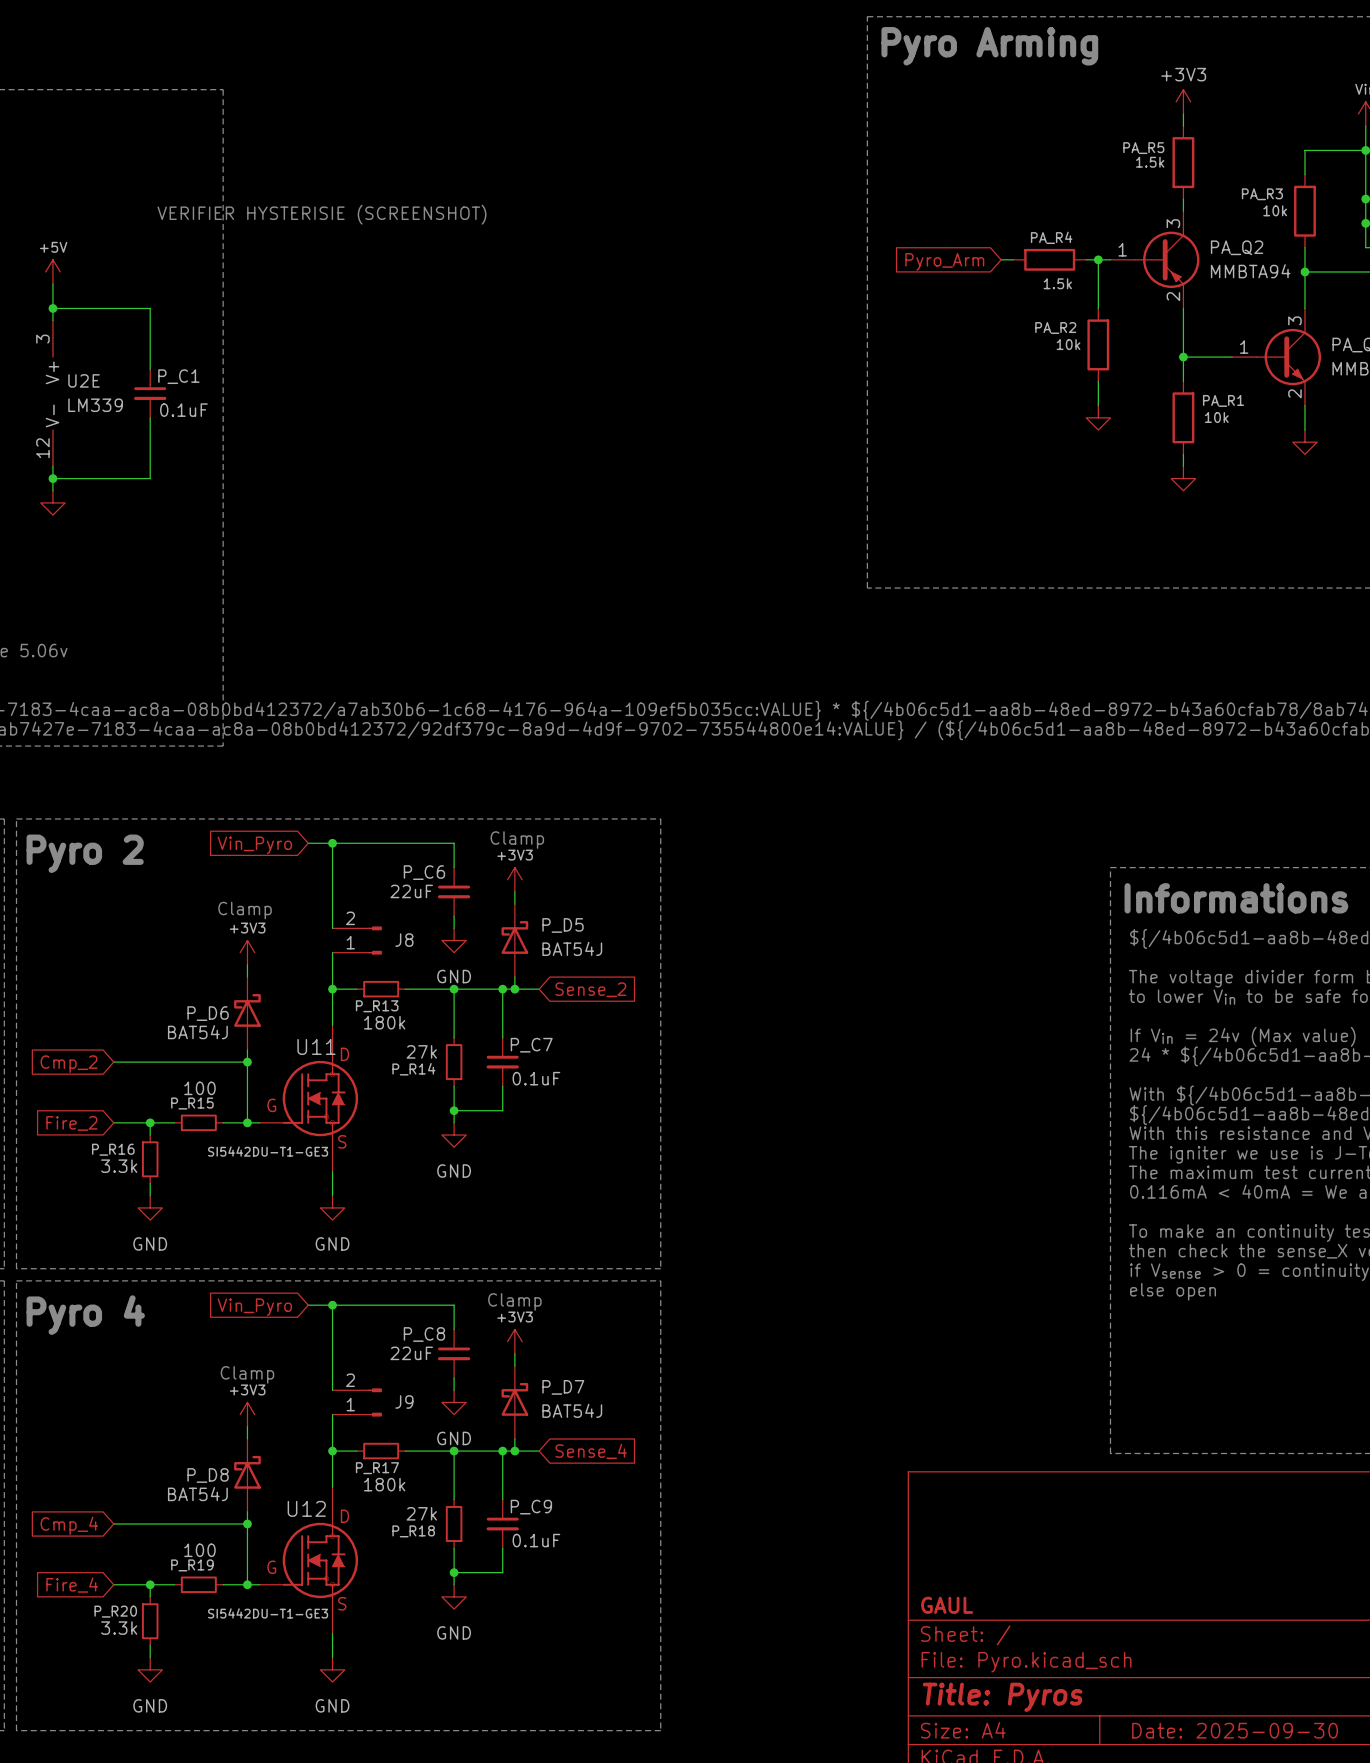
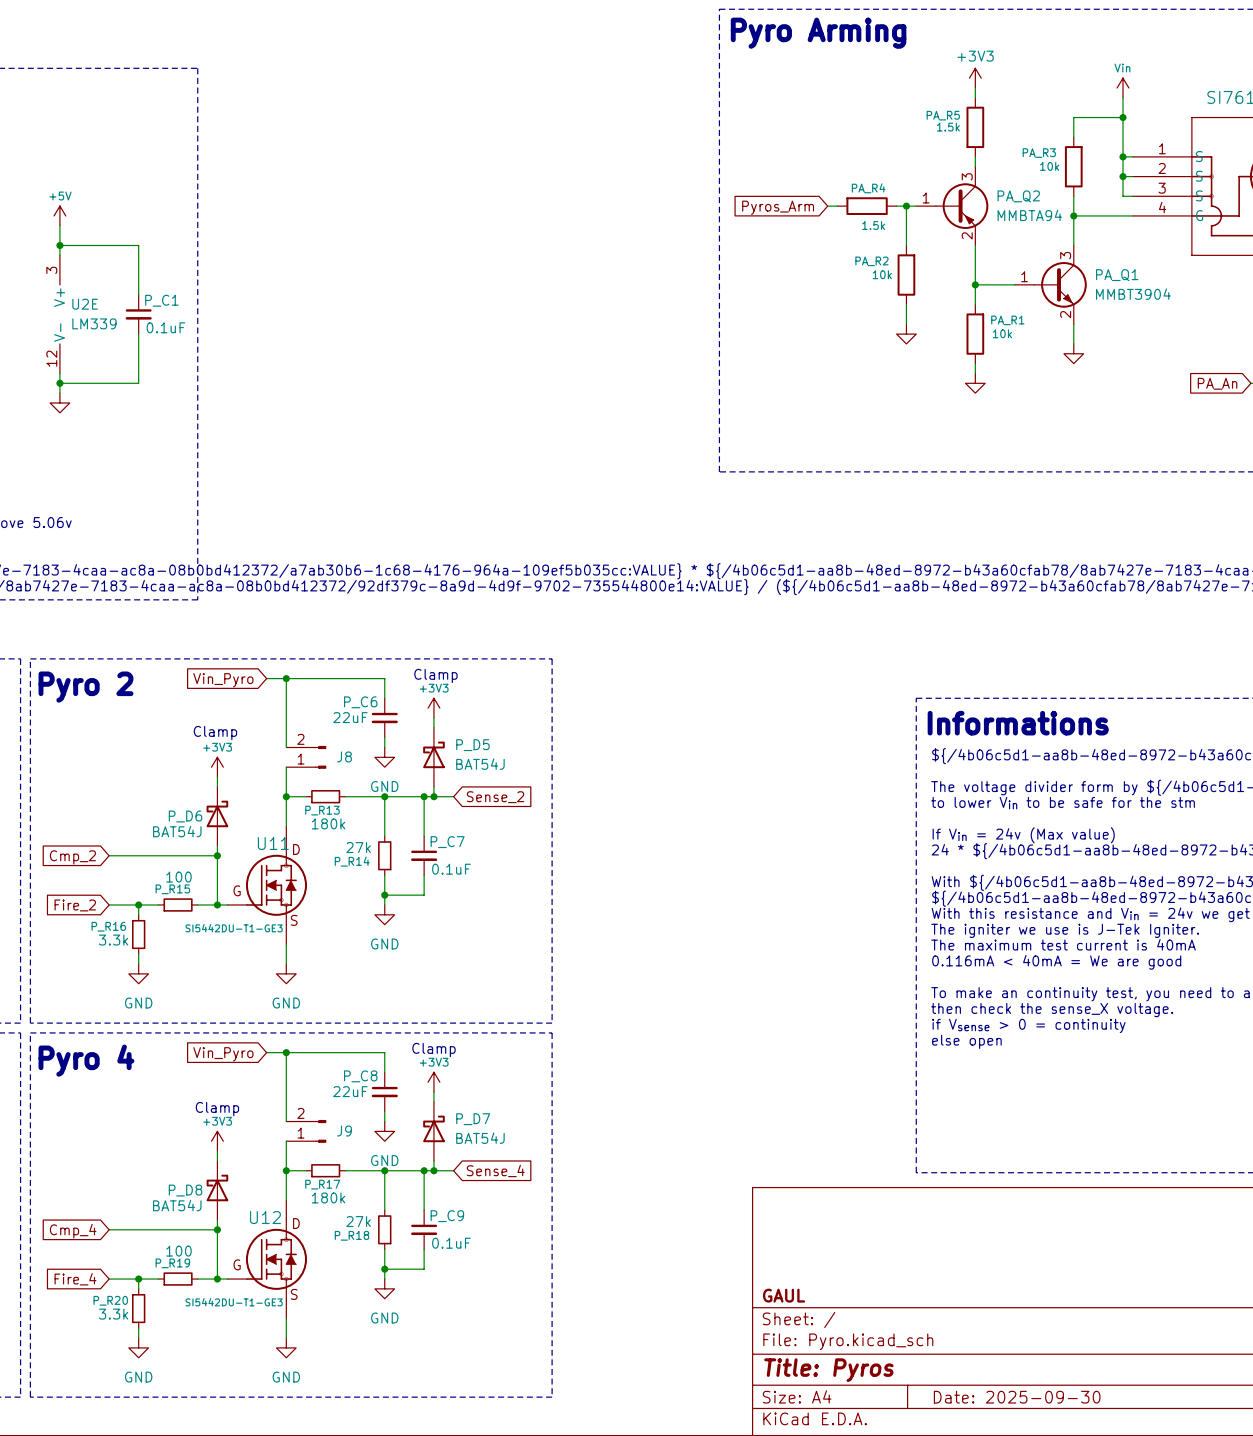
text: VERIFIER HYSTERISIE (SCREENSHOT) (321, 214) -> none
global label: Pyro_Arm (944, 261) -> Pyros_Arm (778, 207)

